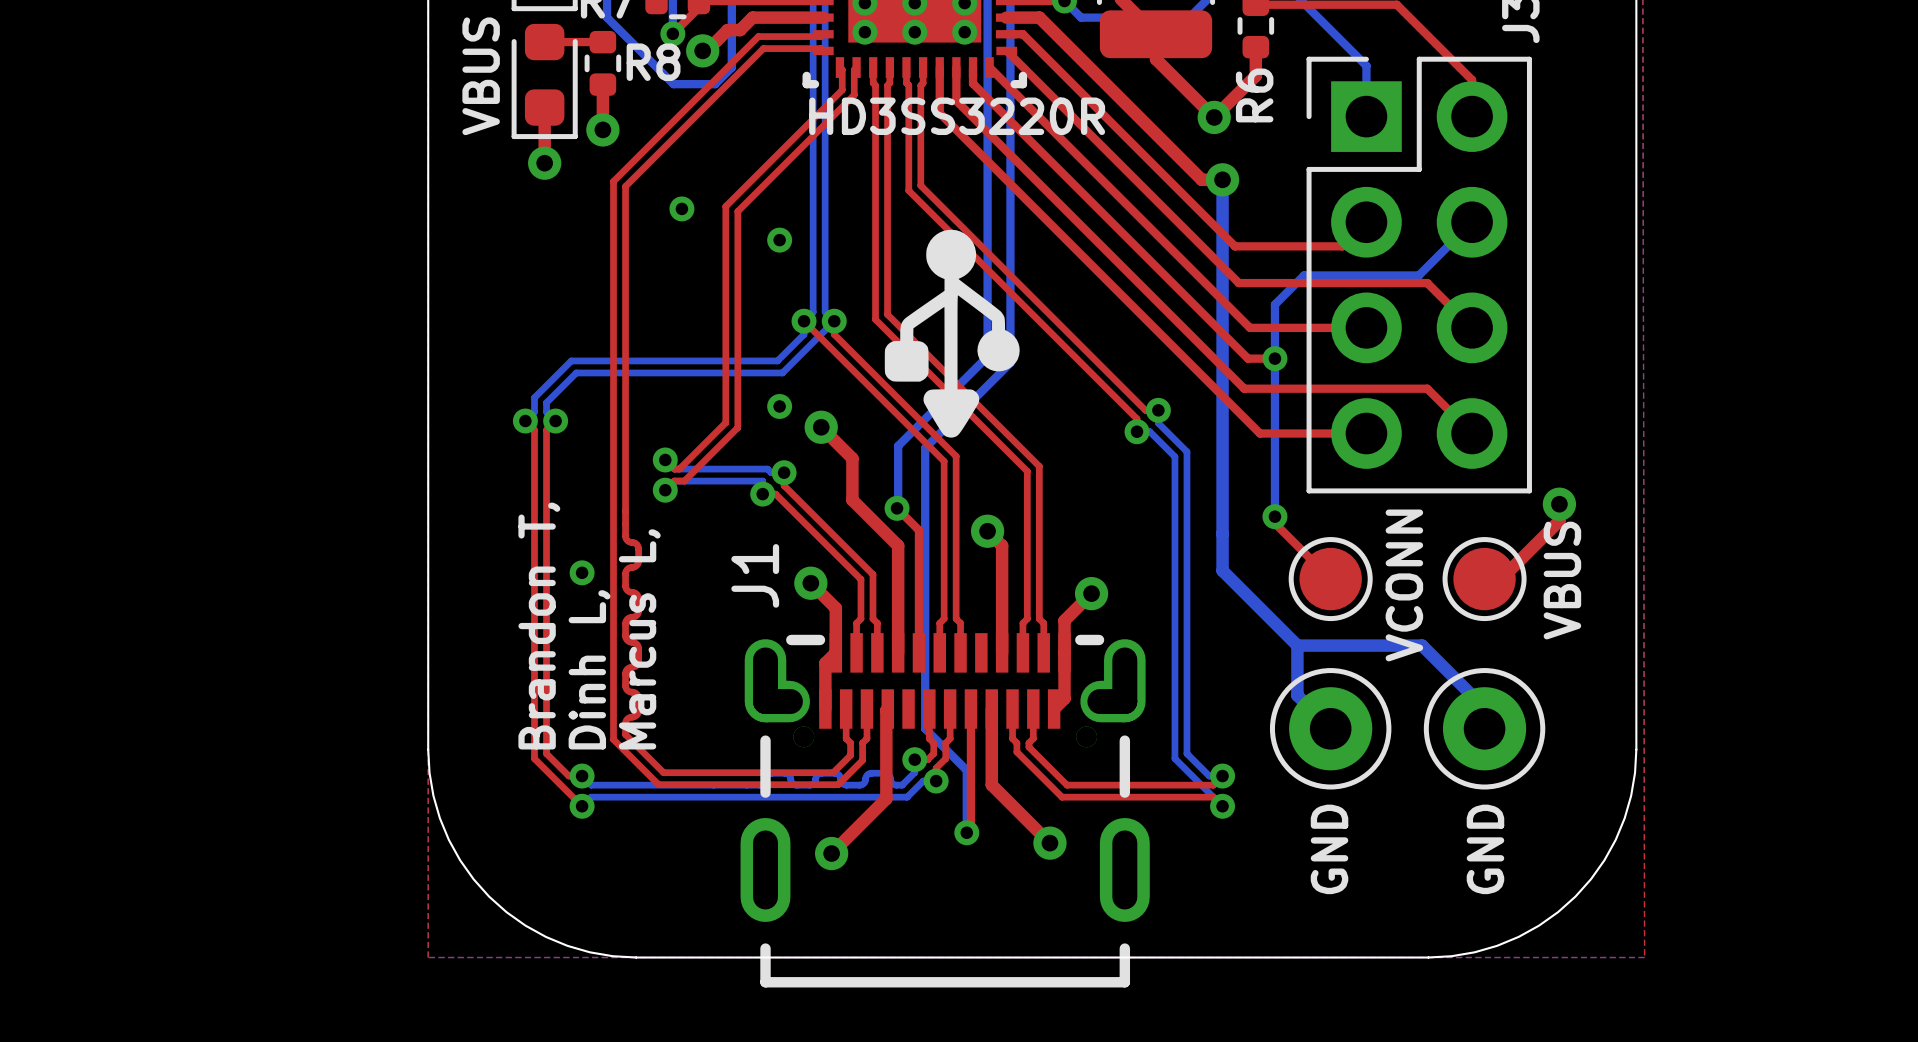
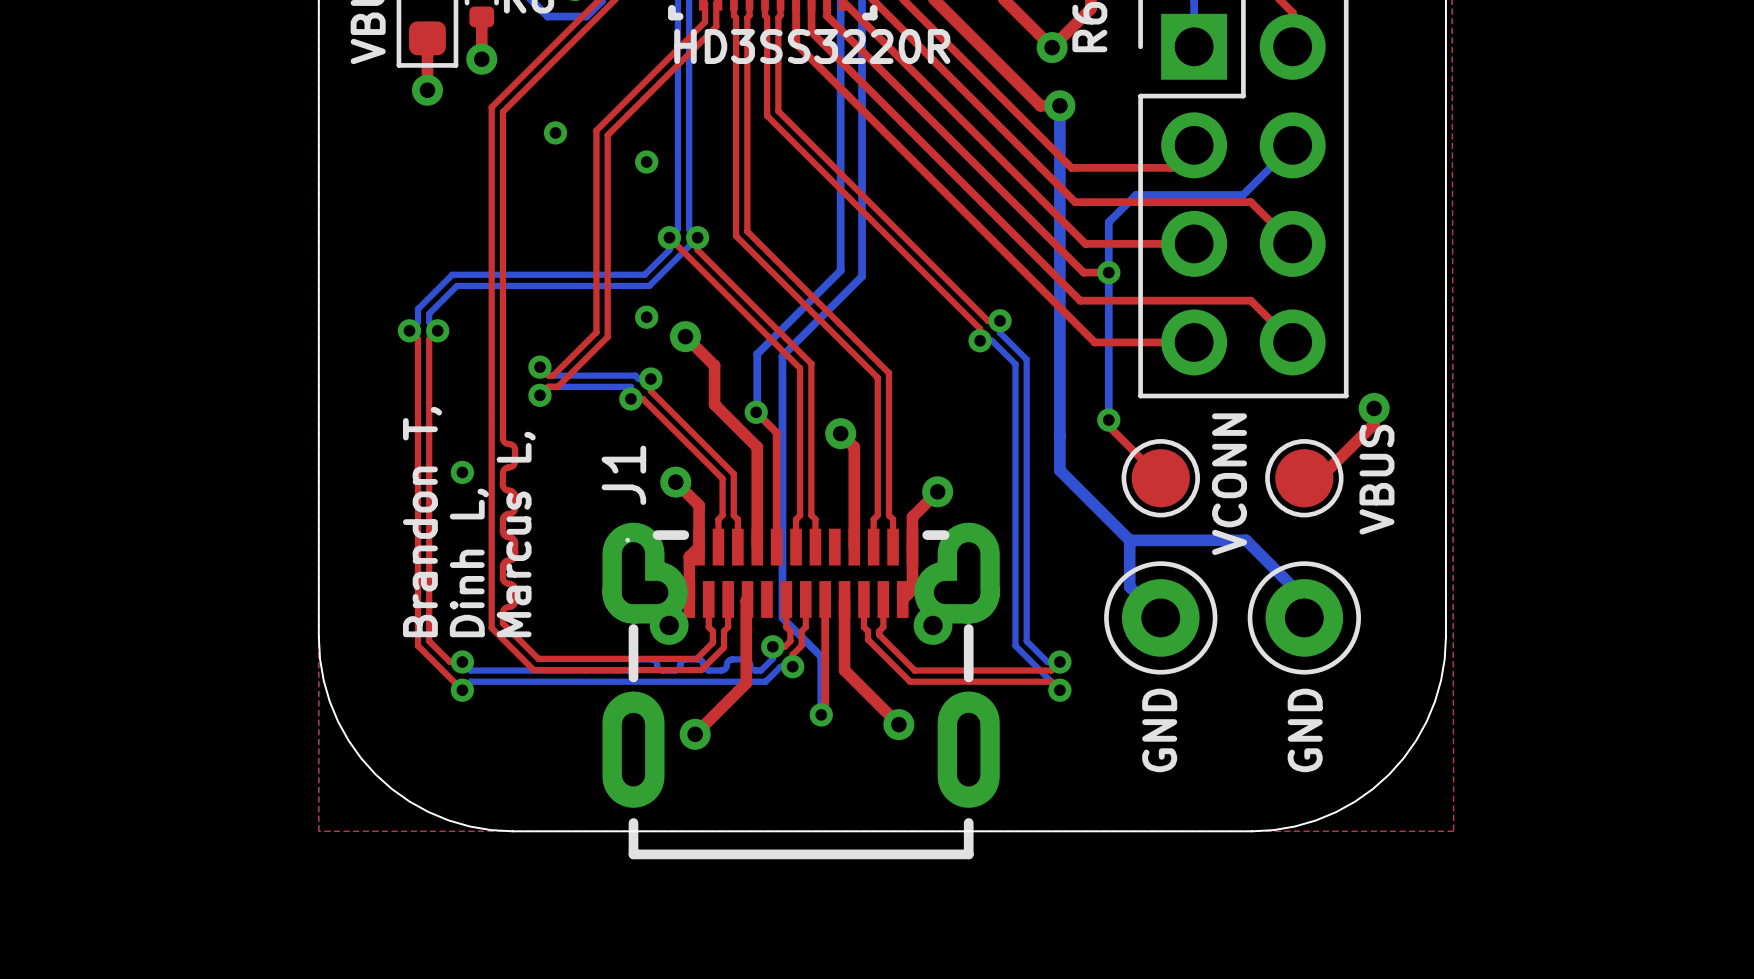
drawing: [884, 229, 1020, 438] -> none
J1 footprint: [740, 633, 1150, 988] -> [602, 522, 1000, 860]

